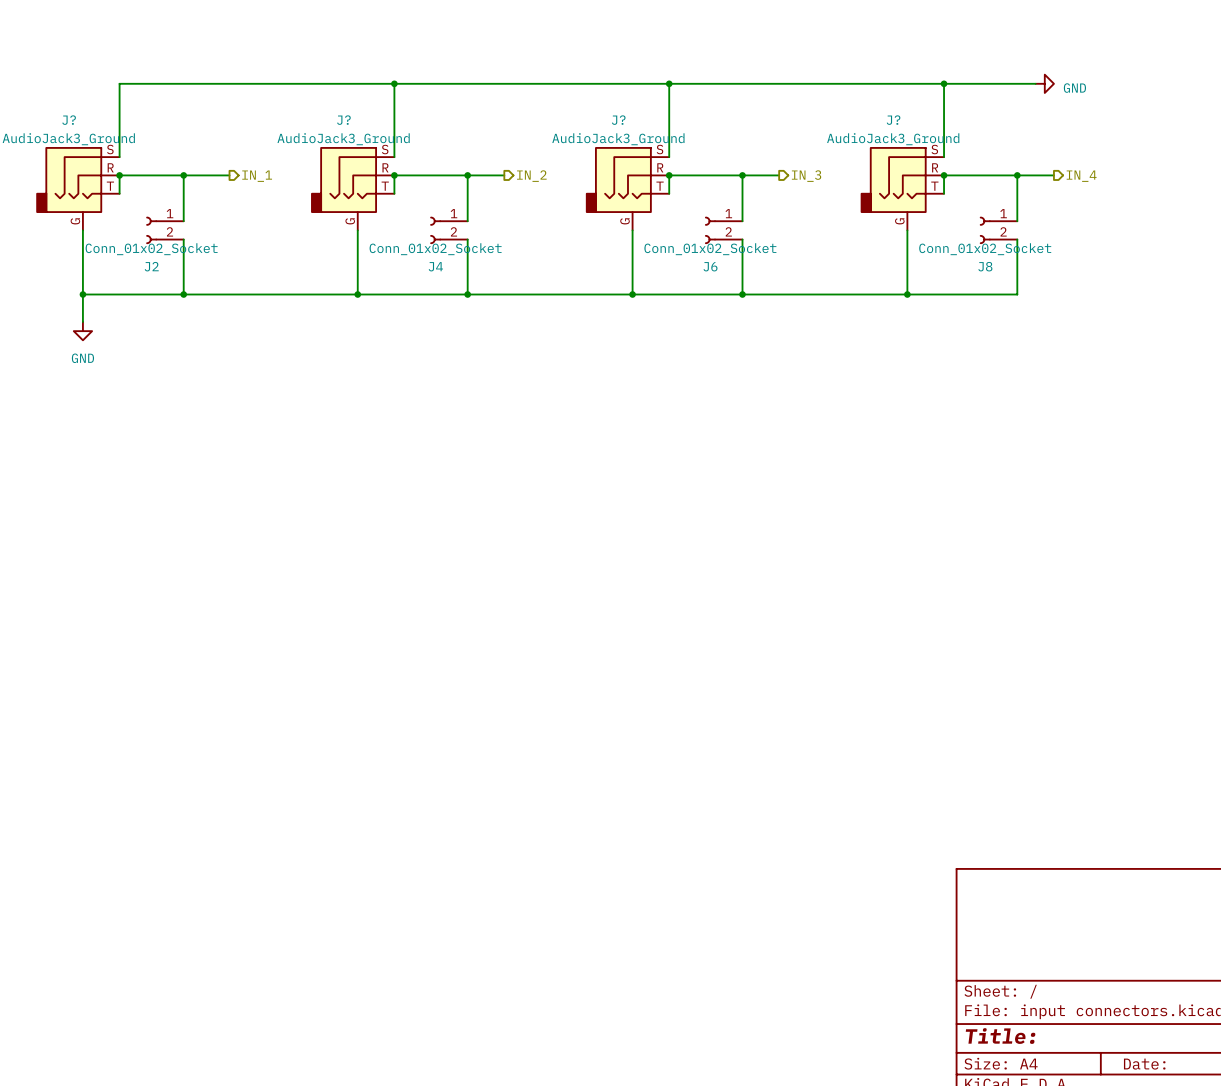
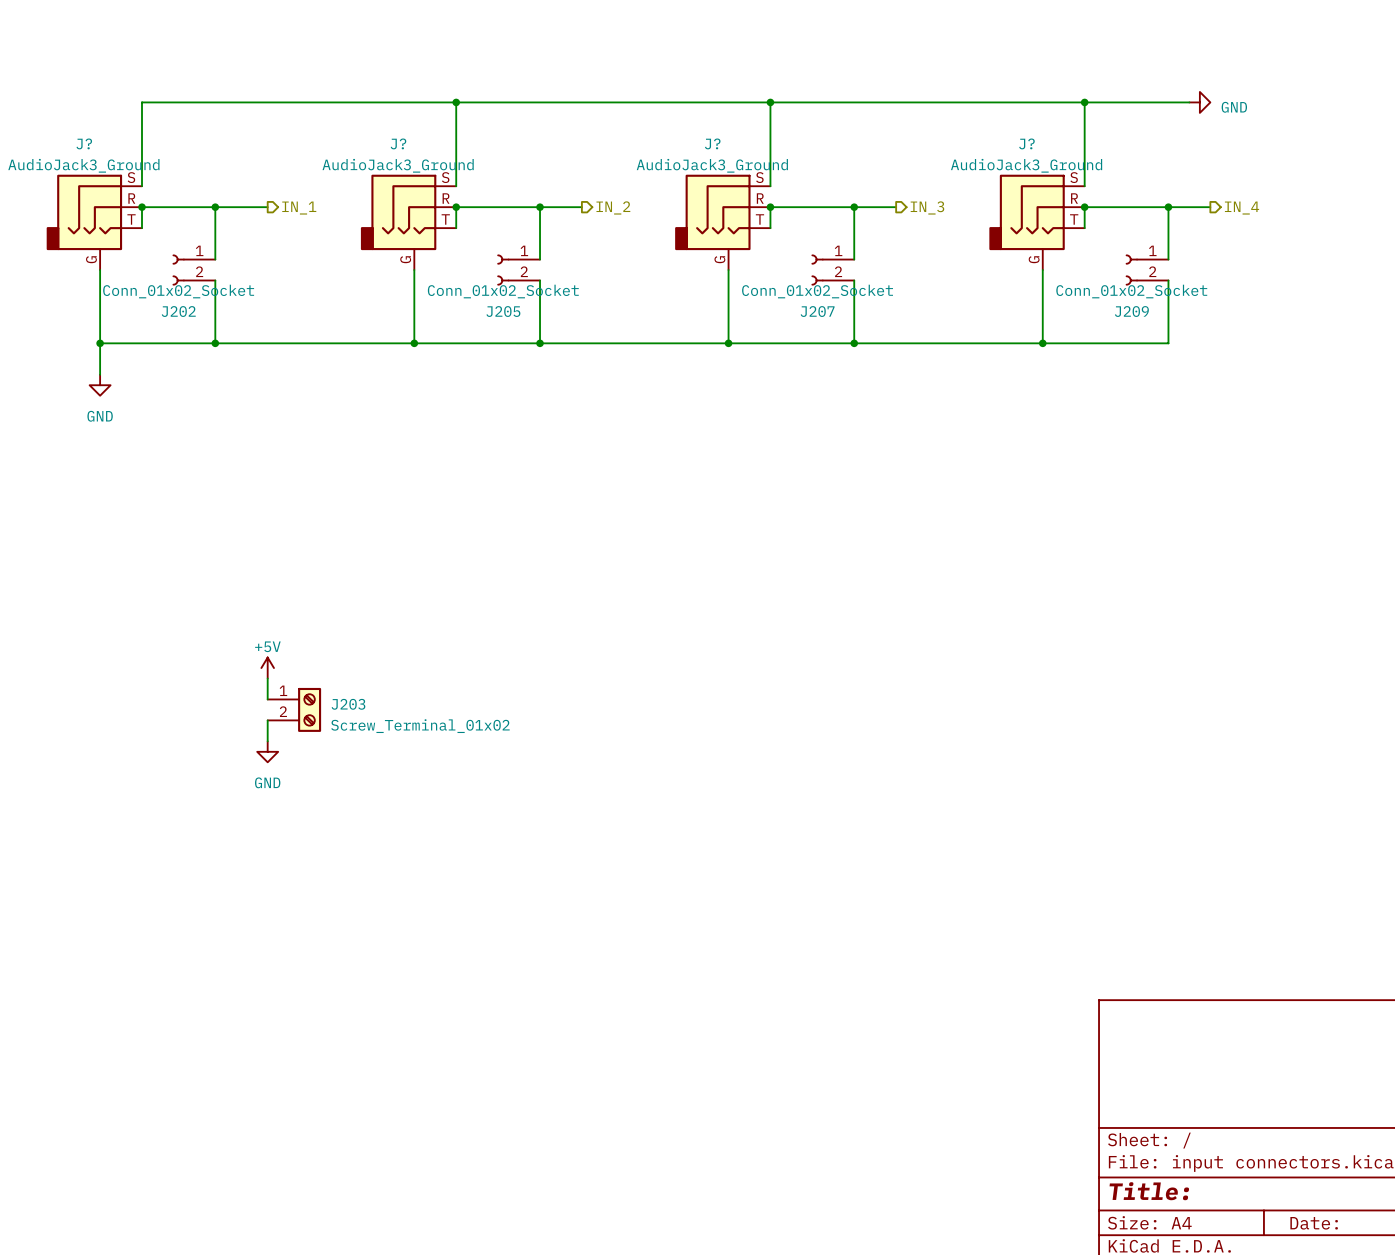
J2 name: J2 (151, 266) -> J202 (178, 311)
J4 name: J4 (435, 266) -> J205 (503, 311)
J6 name: J6 (710, 266) -> J207 (817, 311)
J8 name: J8 (985, 266) -> J209 (1131, 311)
power symbol: none -> +5V (267, 668)
wire: none -> (267, 678) (267, 699)
J203: none -> Screw_Terminal_01x02 (294, 709)
wire: none -> (267, 720) (267, 741)
power symbol: none -> GND (267, 751)

